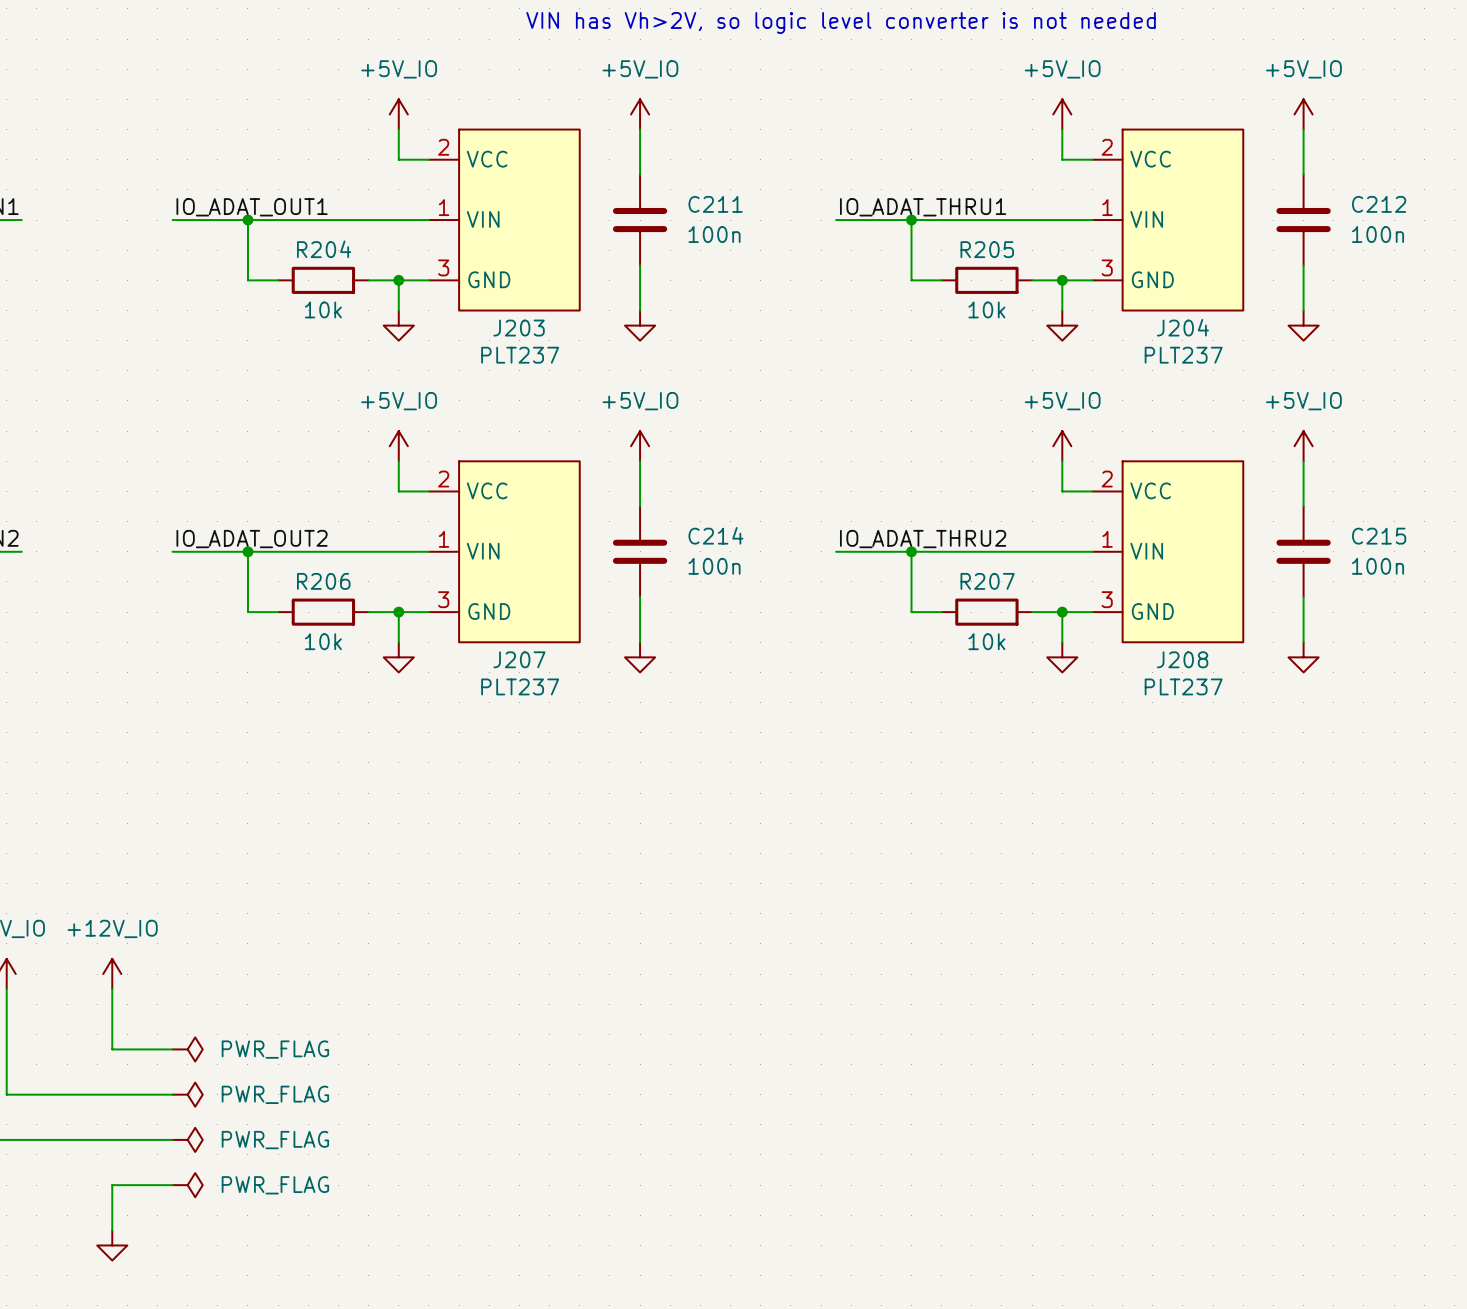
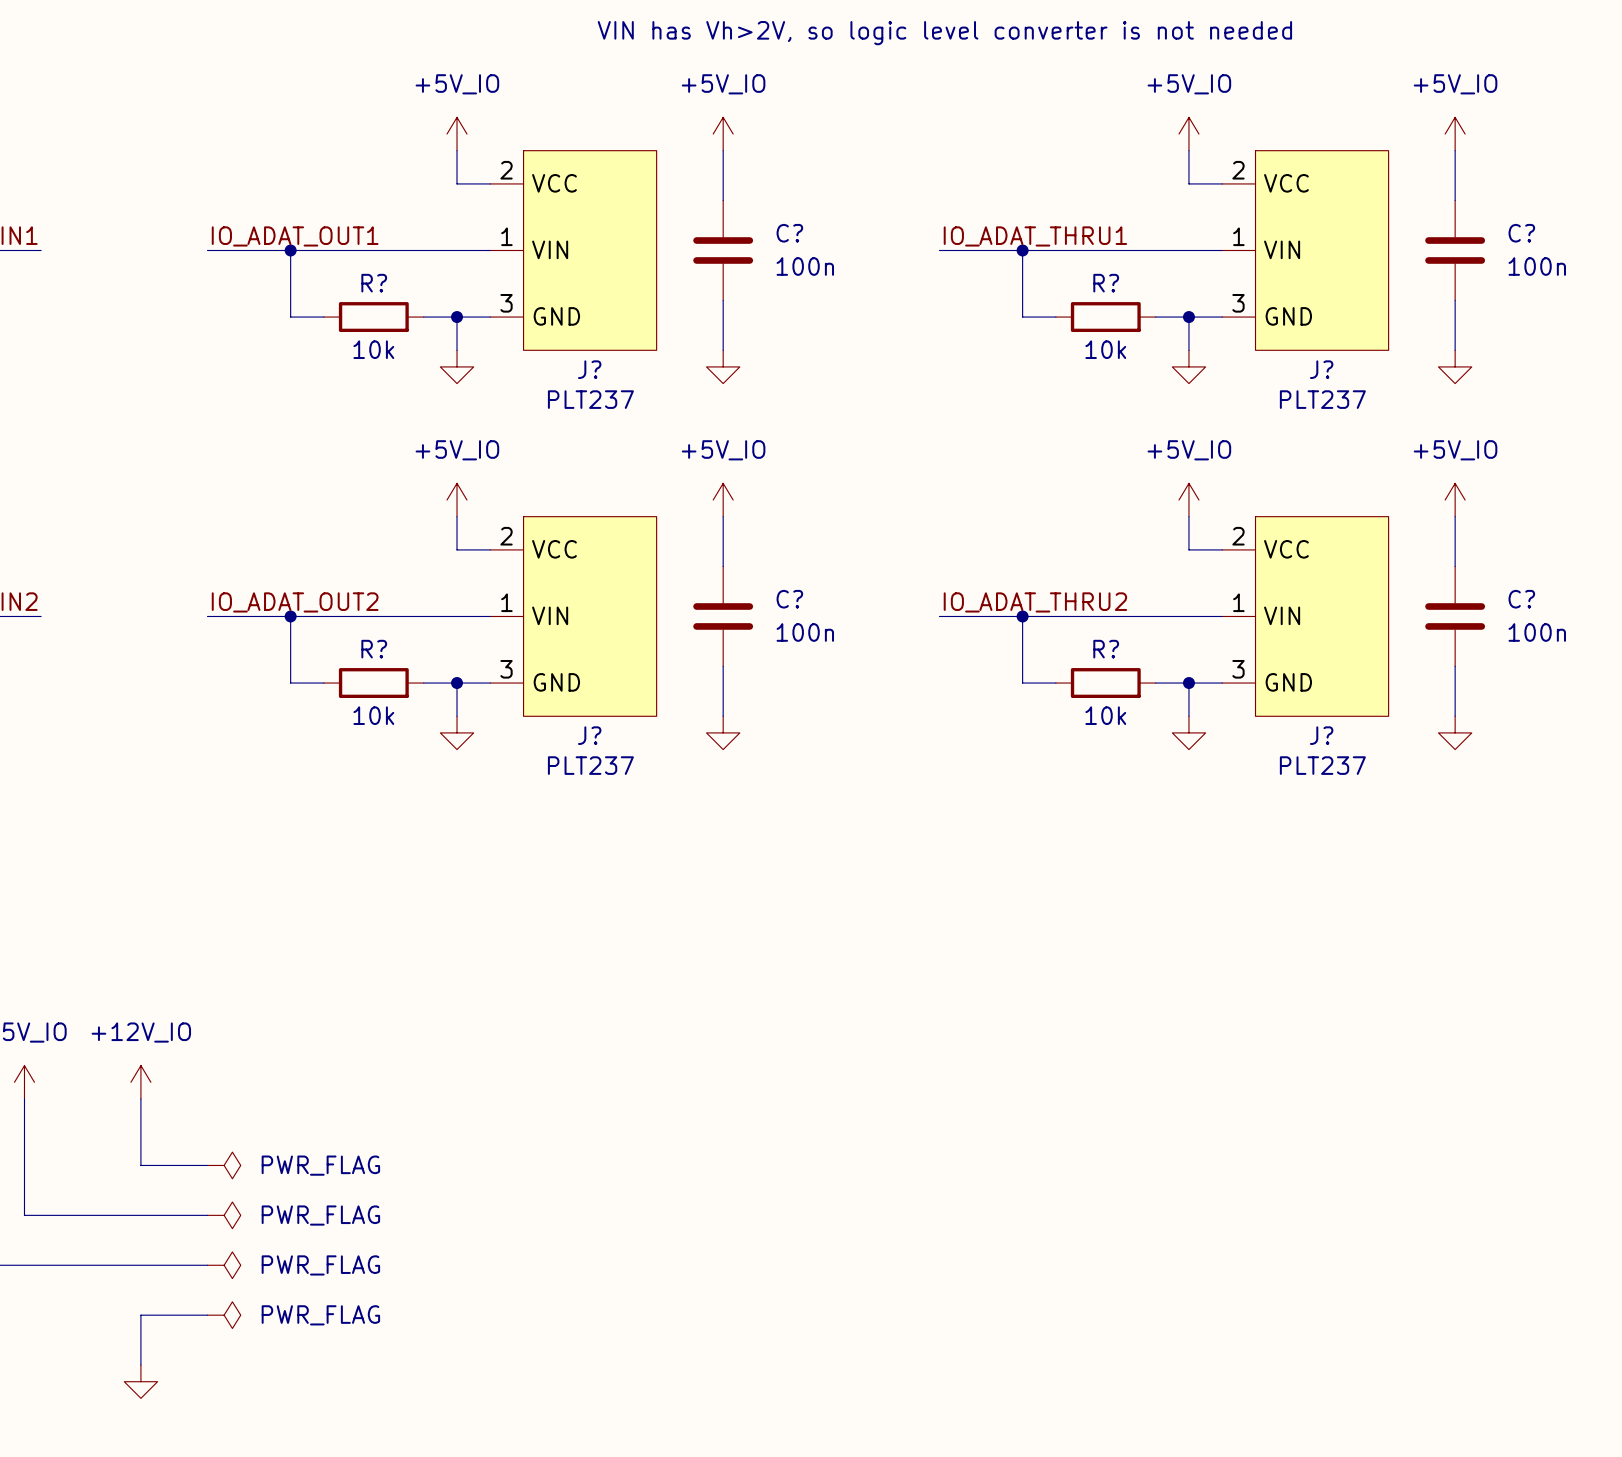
C211 name: C211 (715, 204) -> C? (789, 233)
C212 name: C212 (1379, 204) -> C? (1521, 233)
R204 name: R204 (324, 249) -> R? (374, 283)
R205 name: R205 (987, 249) -> R? (1106, 283)
J204 name: J204 (1182, 327) -> J? (1321, 369)
J203 name: J203 (519, 328) -> J? (589, 369)
C214 name: C214 (715, 535) -> C? (789, 599)
C215 name: C215 (1379, 536) -> C? (1521, 599)
R206 name: R206 (323, 581) -> R? (374, 649)
R207 name: R207 (987, 581) -> R? (1106, 649)
J207 name: J207 (519, 659) -> J? (589, 735)
J208 name: J208 (1182, 659) -> J? (1321, 735)

